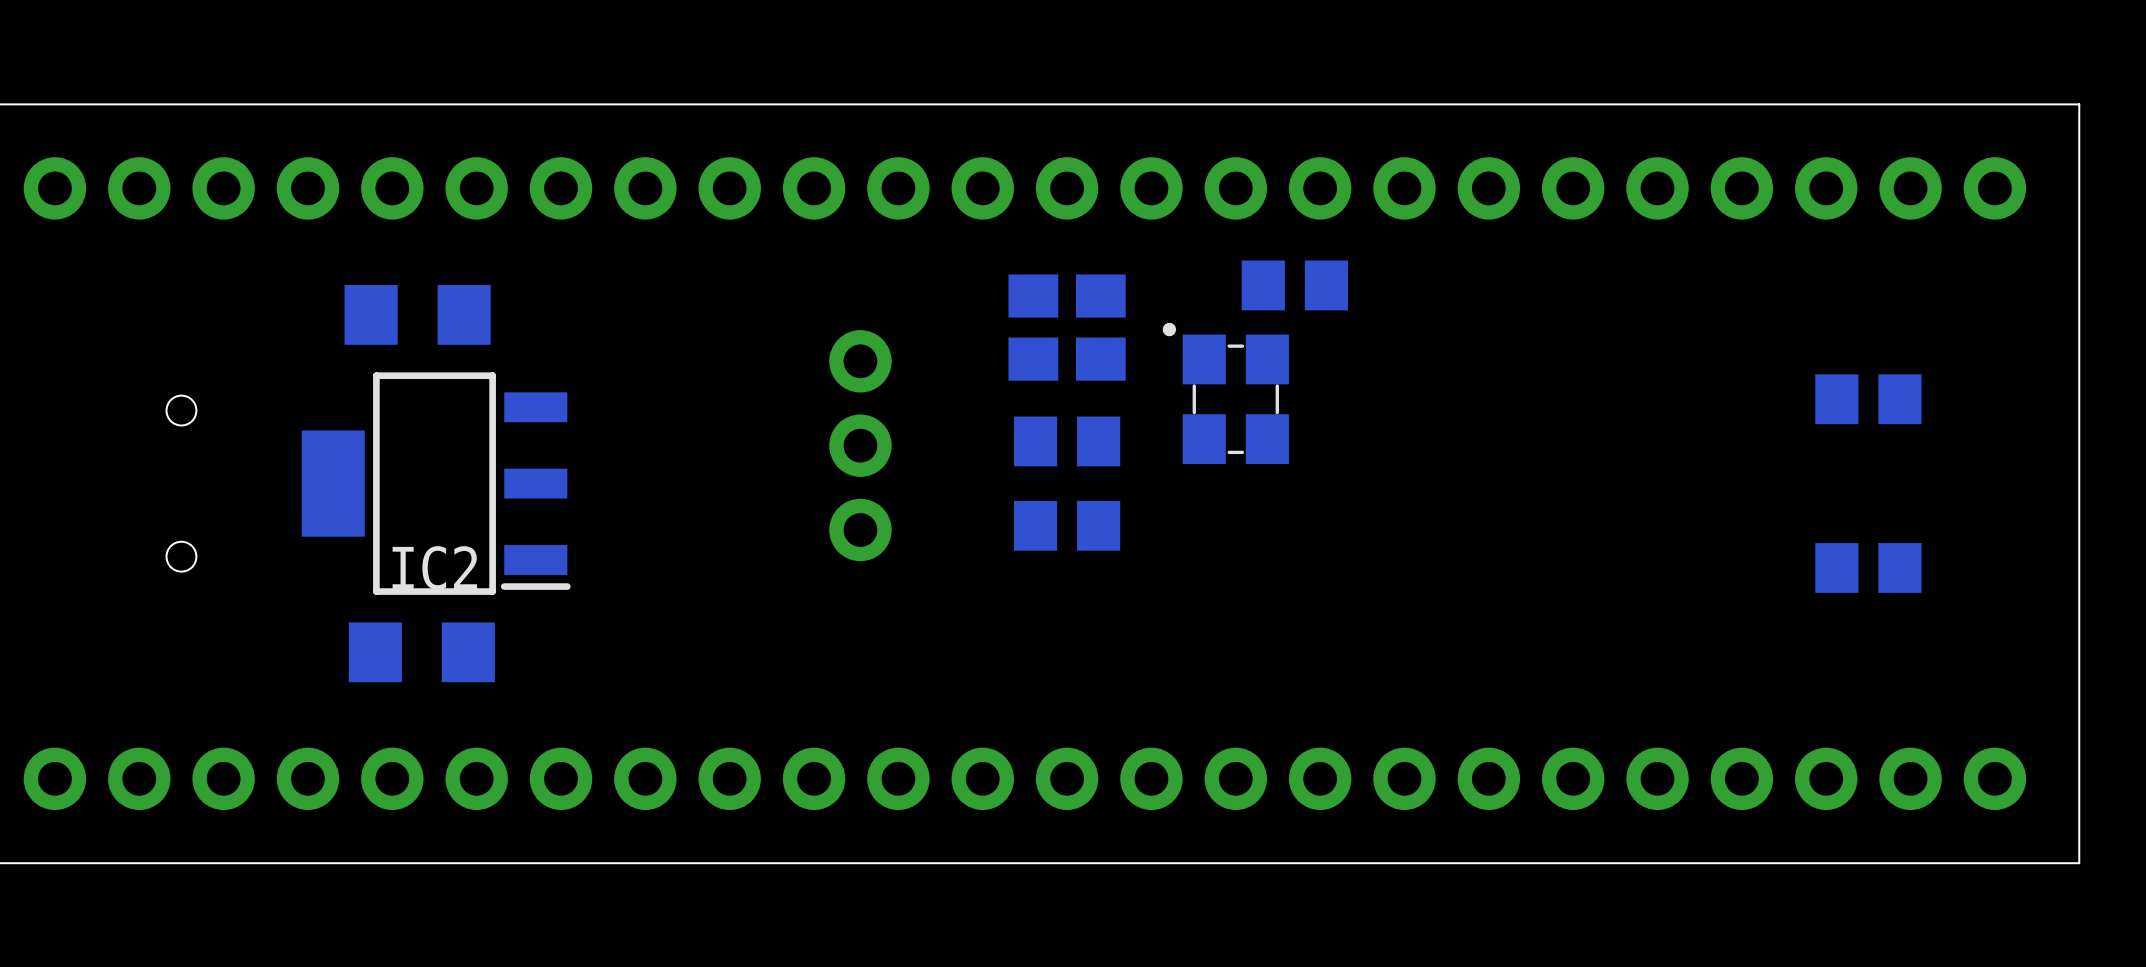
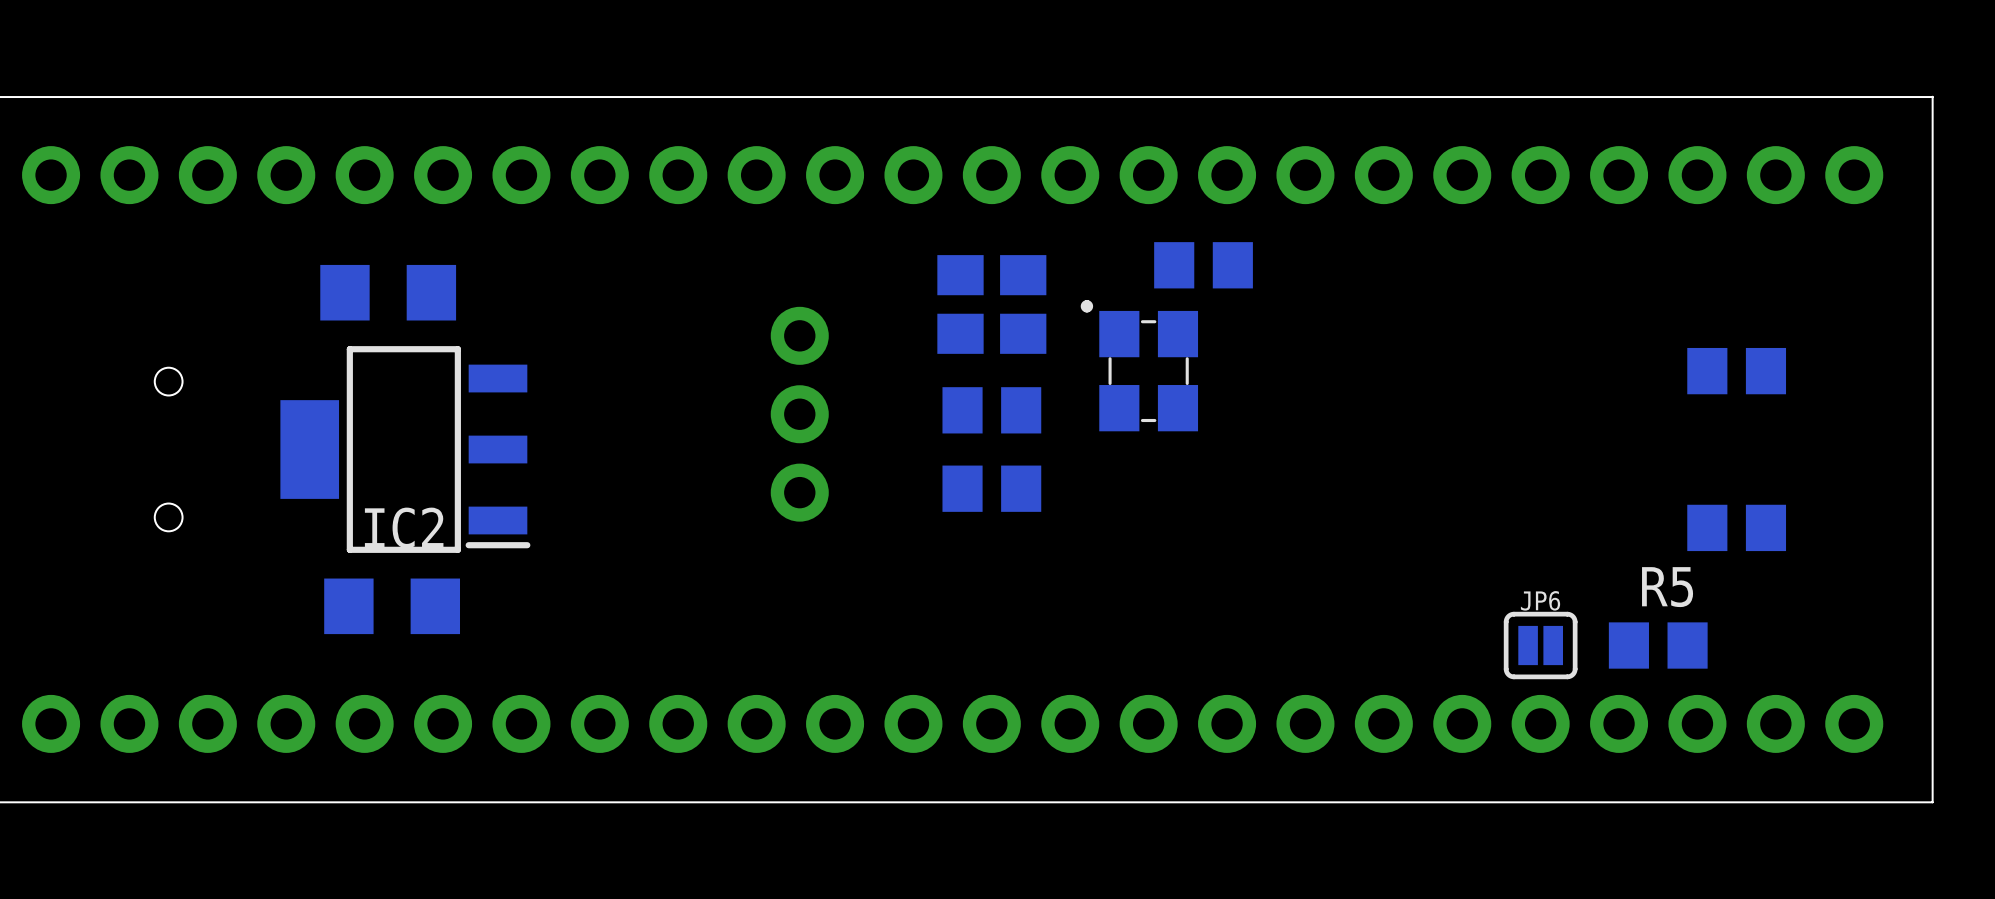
JP6: none -> (1540, 645)
R5: none -> (1658, 645)

